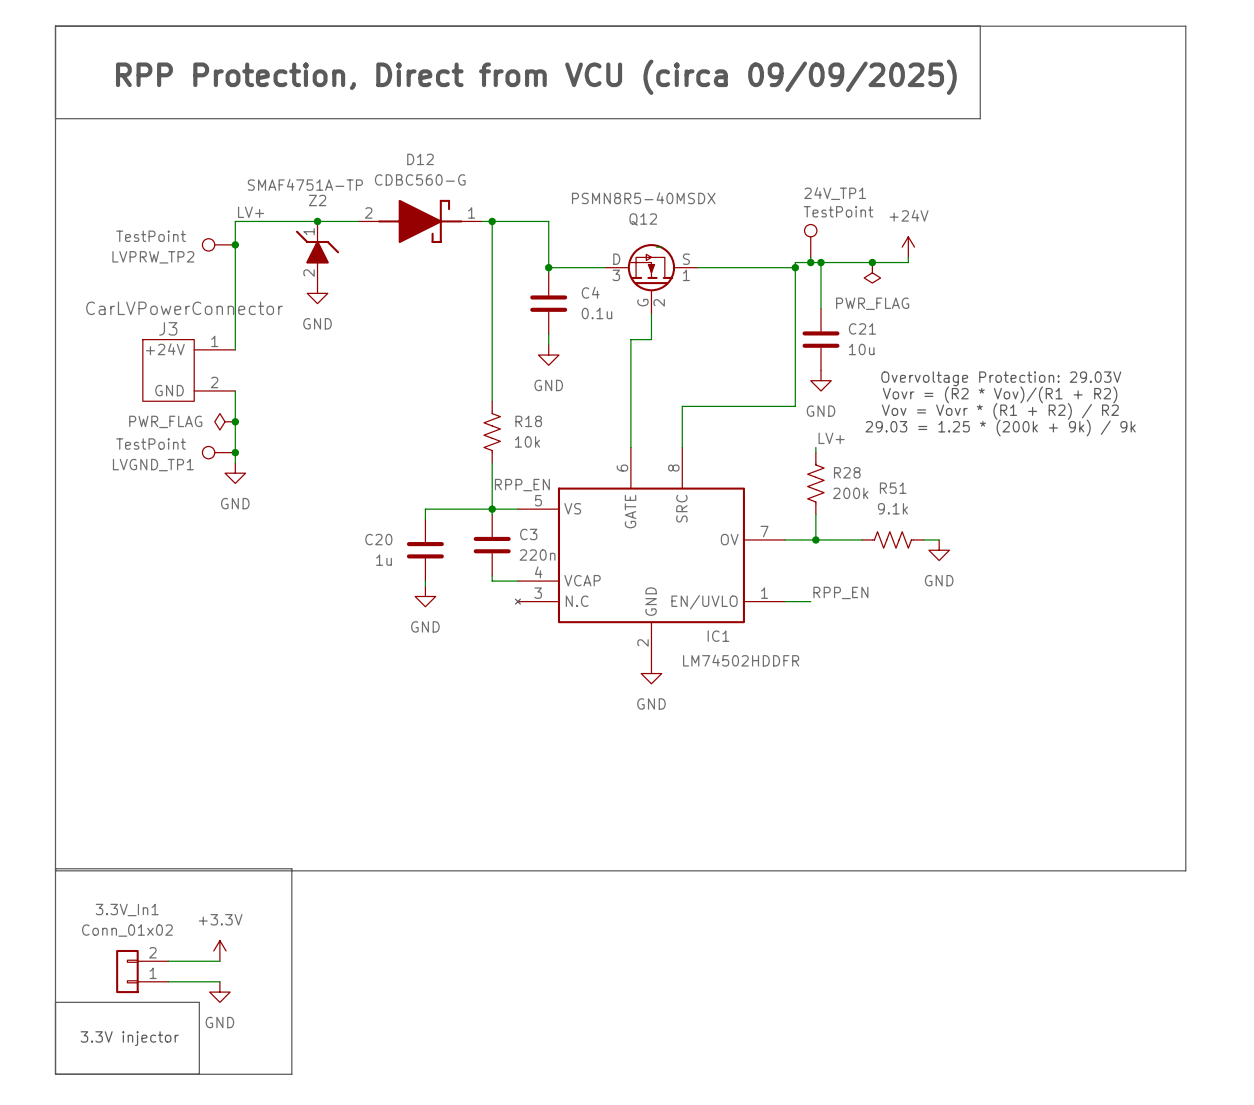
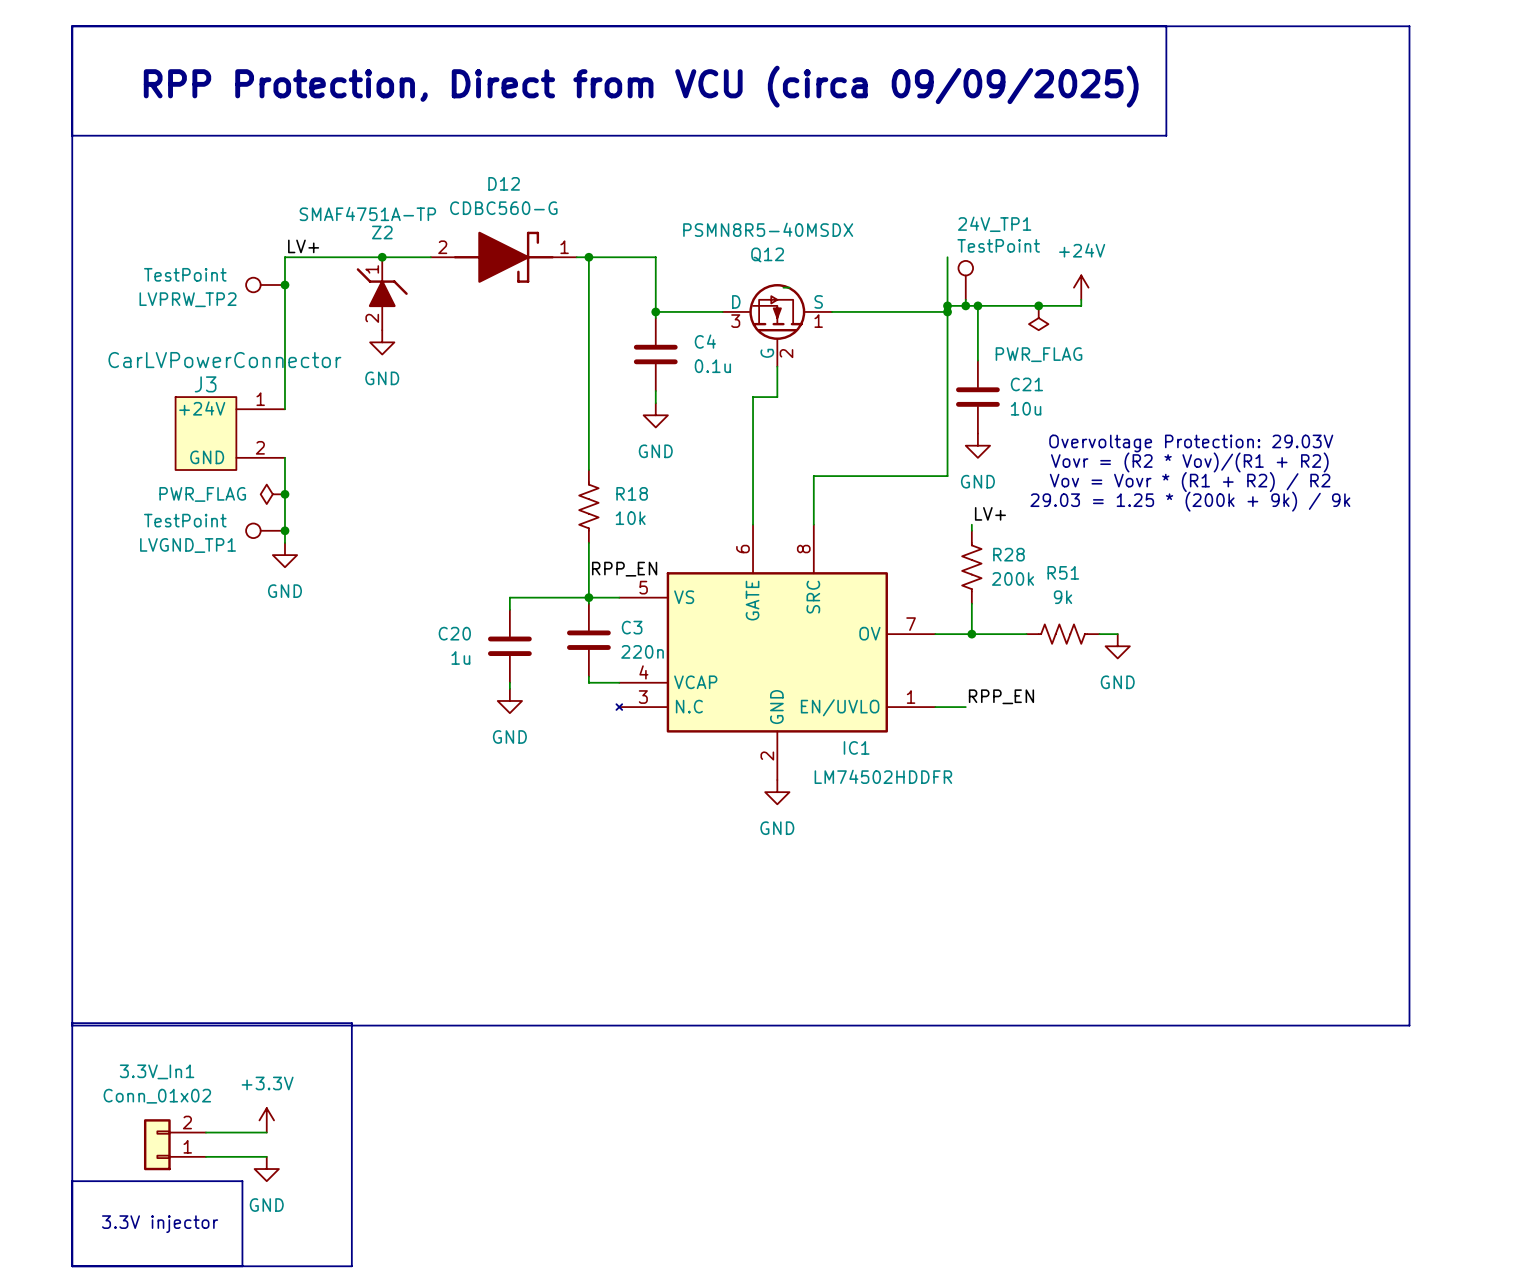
wire: none -> (947, 257) (947, 305)
junction: none -> (947, 305)
R51 value: 9.1k (892, 508) -> 9k (1063, 597)

